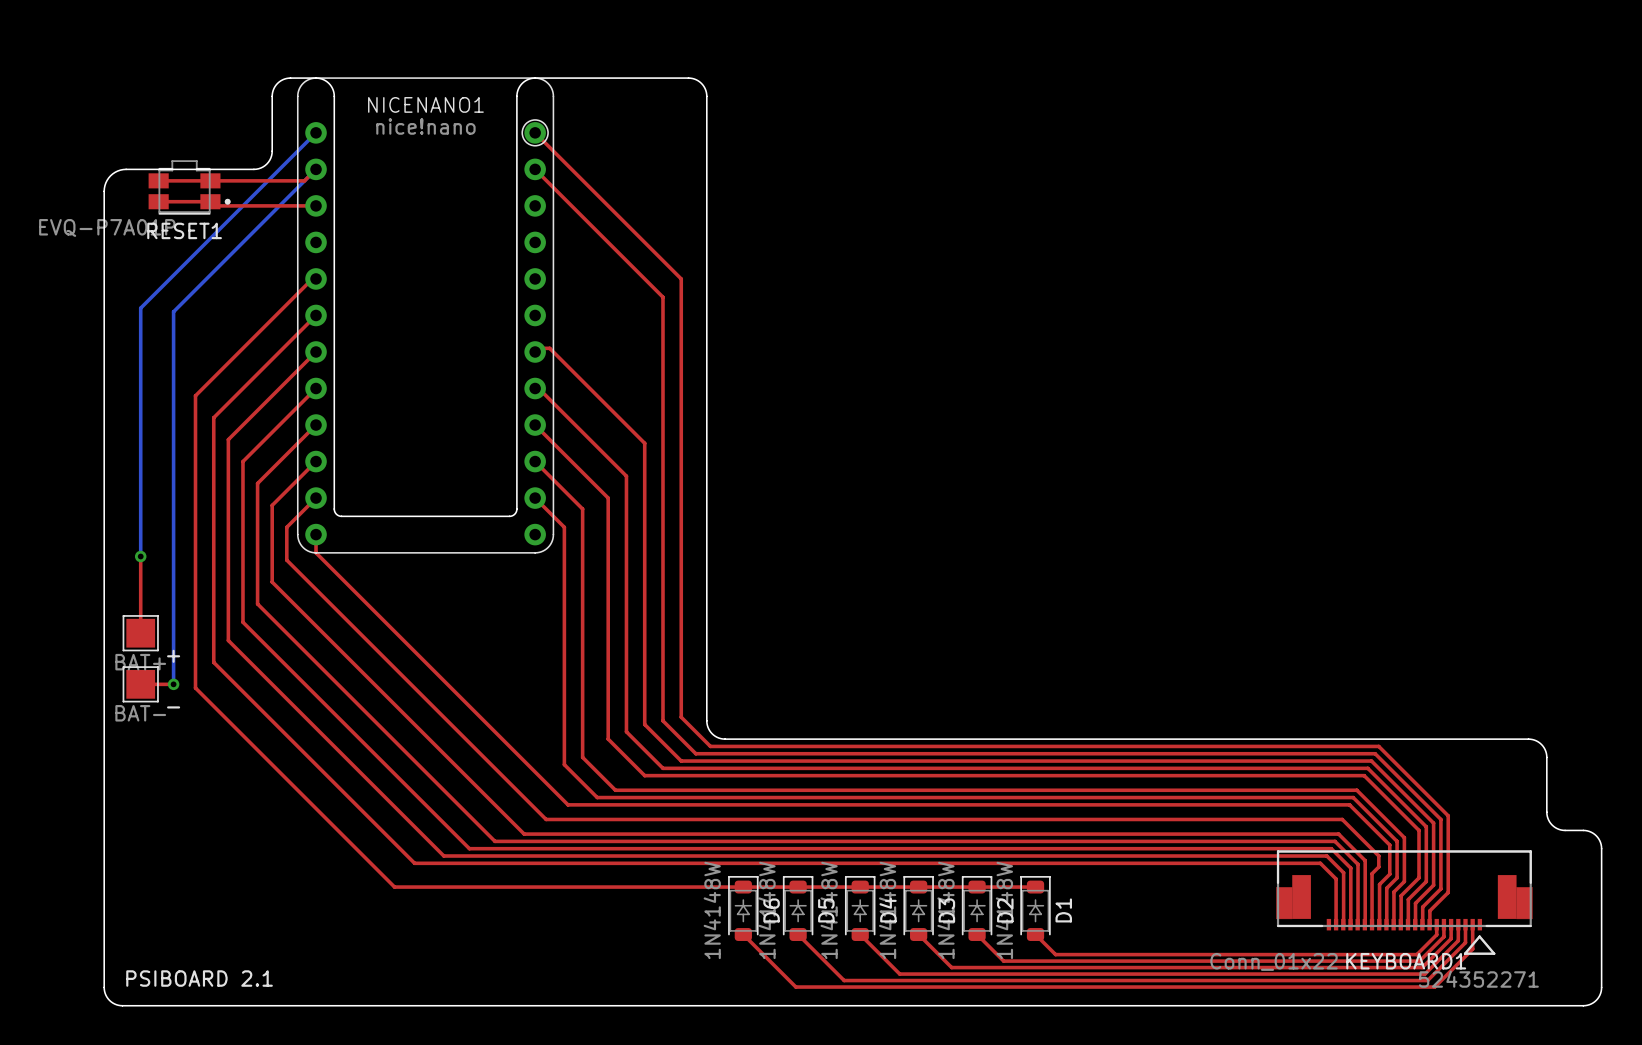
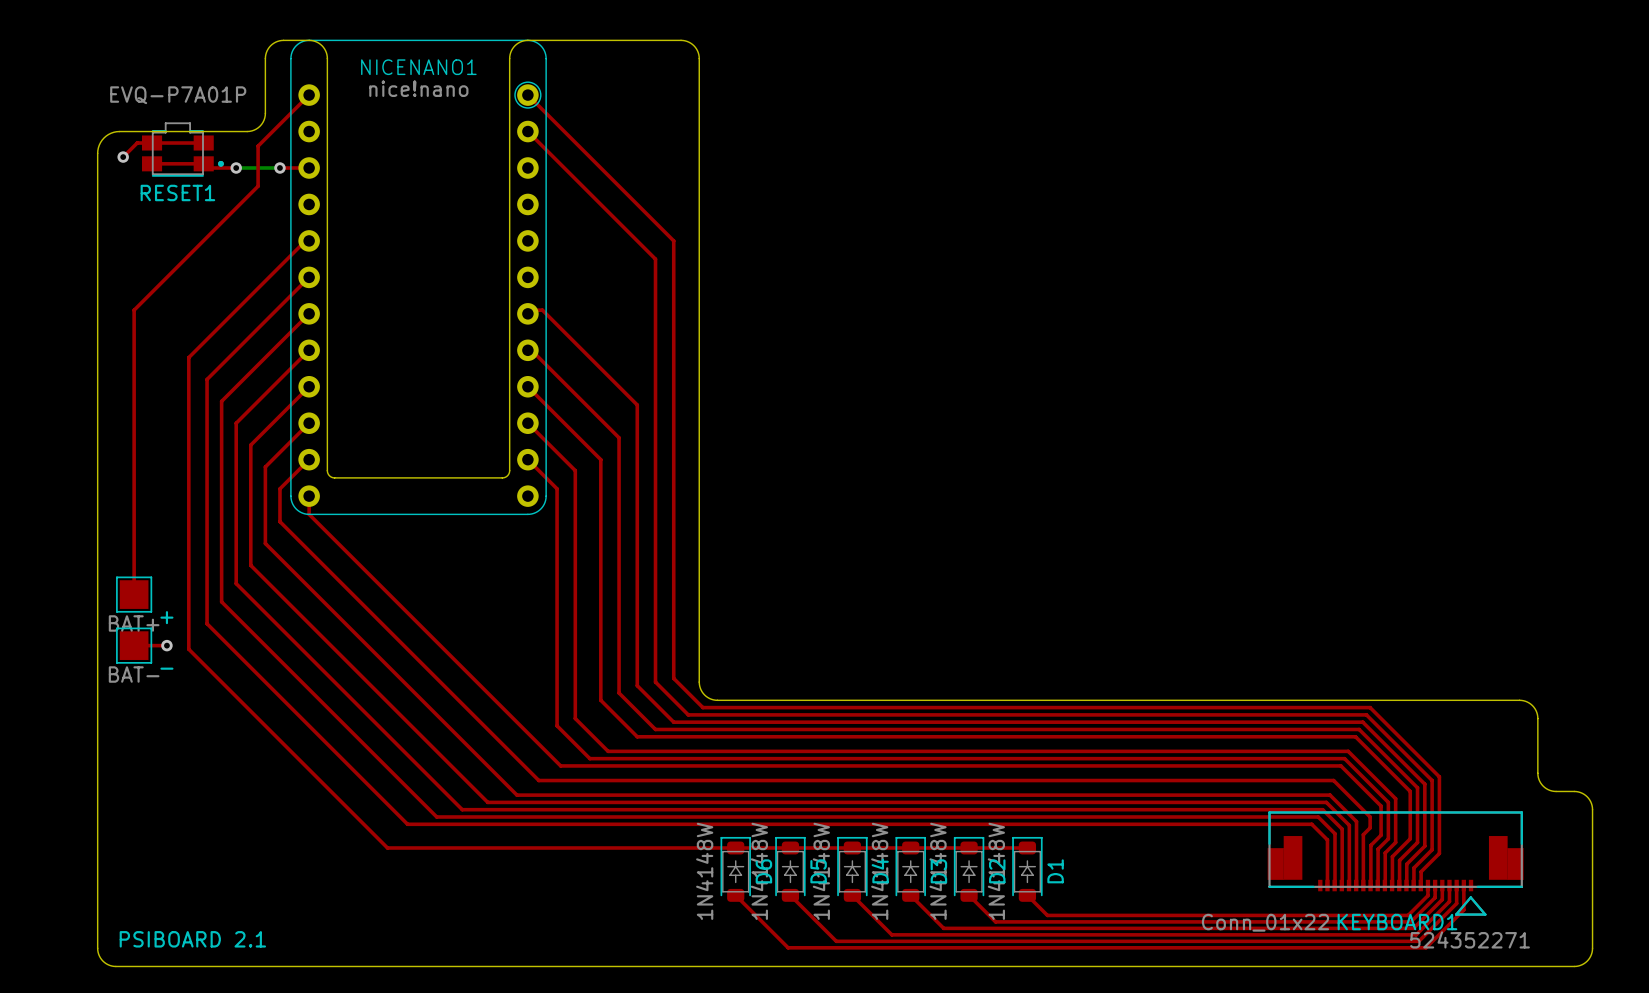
top track: none -> (309, 95) (258, 146) (258, 186) (134, 310) (134, 518)
bottom track: (316, 132) (140, 308) (140, 556) -> none
top track: (316, 169) (304, 180) (210, 180) -> none
bottom track: (316, 169) (173, 311) (173, 684) -> none
top track: none -> (152, 143) (137, 143) (123, 157)
via: none -> (123, 157)
top track: (242, 205) (286, 205) -> none
bottom track: none -> (236, 167) (279, 167)
via: none -> (236, 167)
via: none -> (279, 167)
RESET1 value position: EVQ-P7A01P (107, 227) -> EVQ-P7A01P (178, 95)
via: (140, 556) -> none

